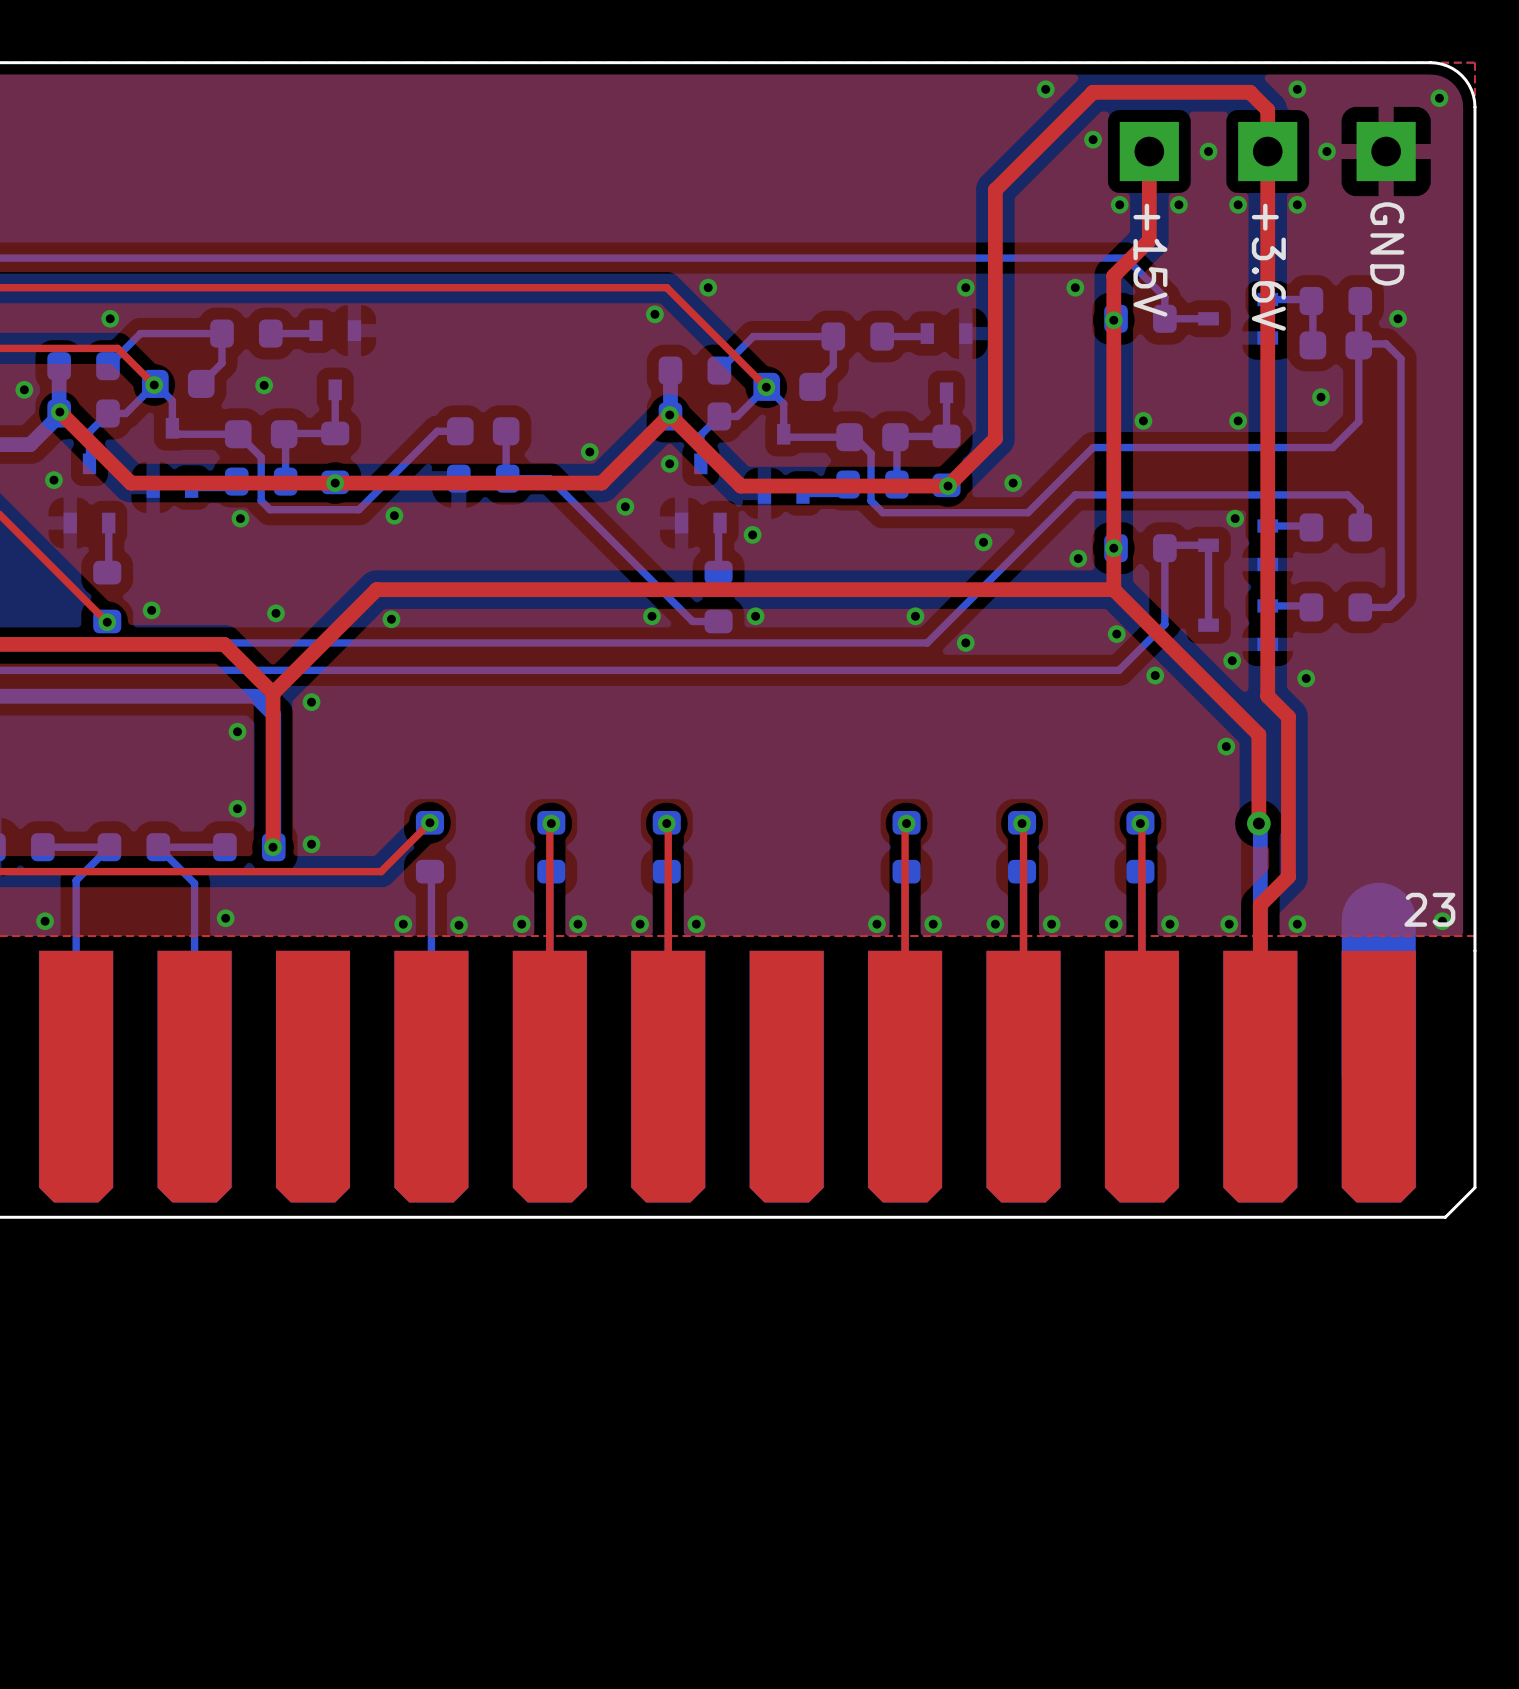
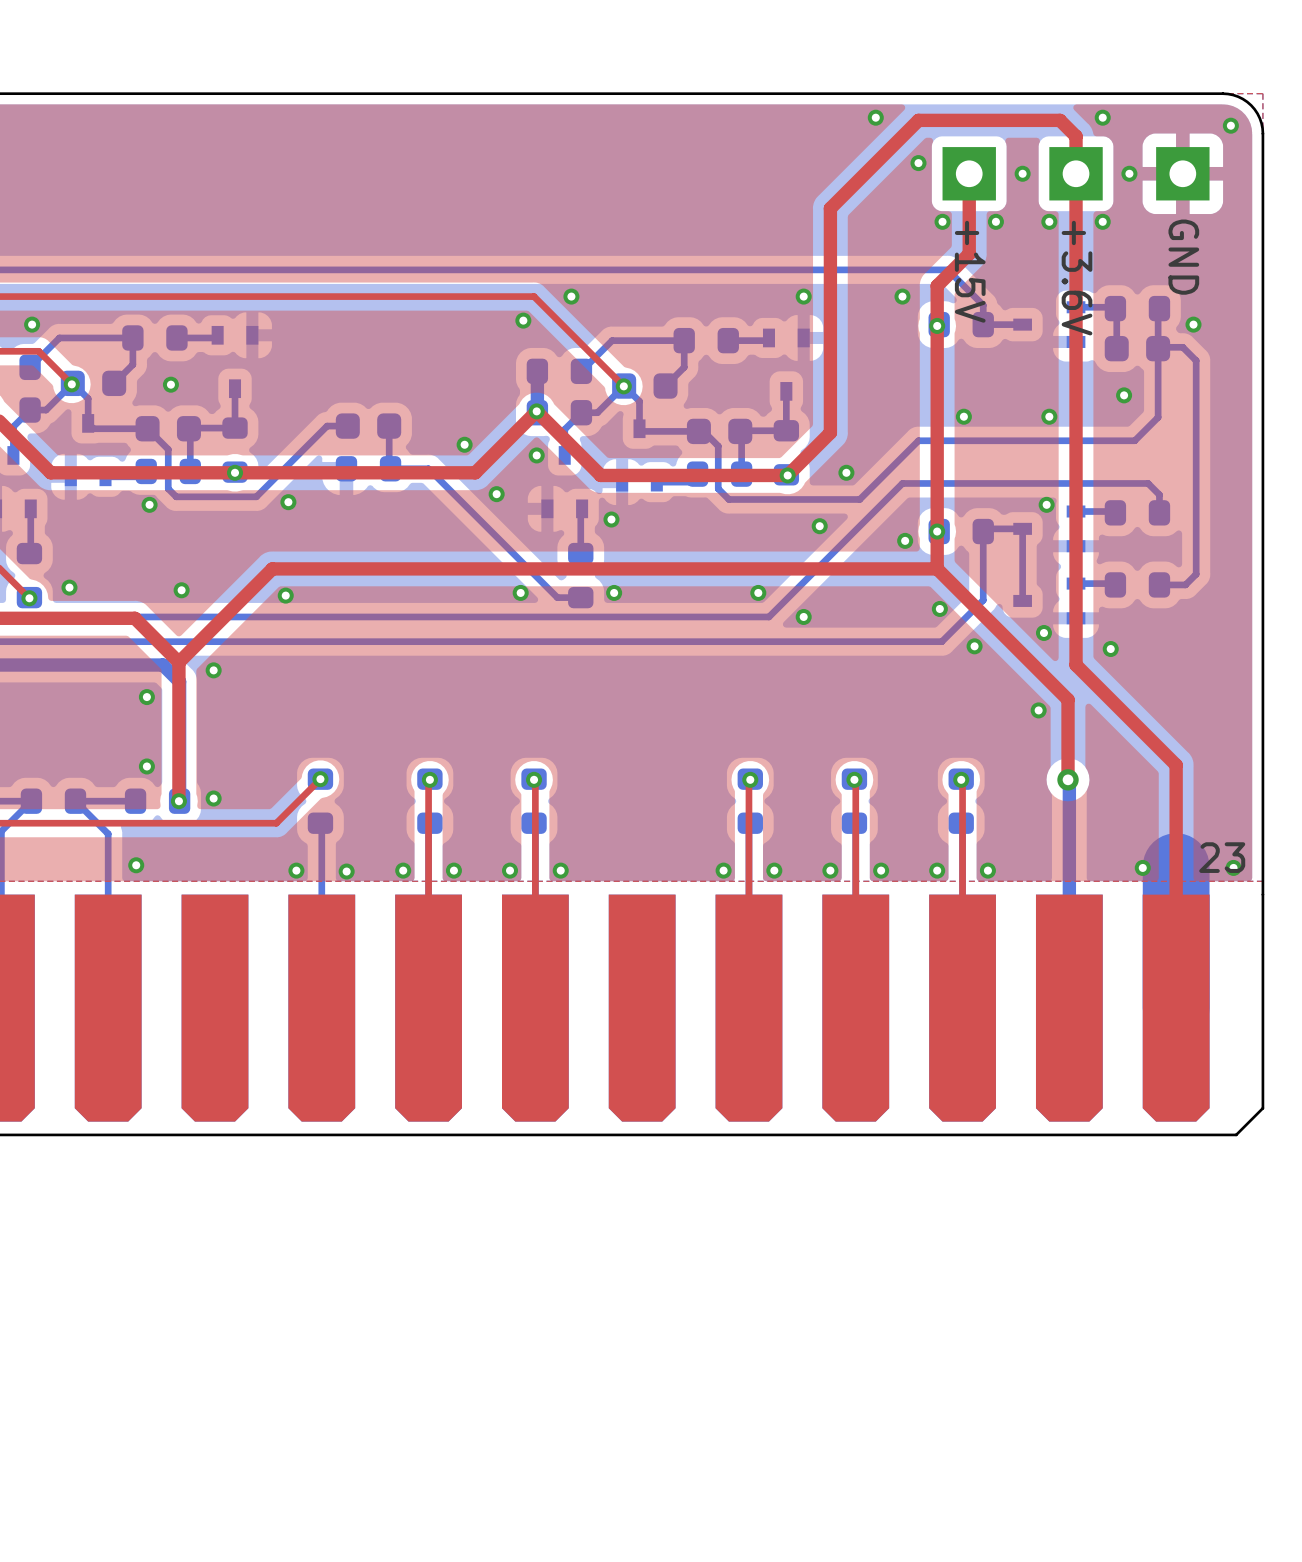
top track: (1288, 716) (1288, 876) (1260, 904) (1260, 1076) -> (1094, 683) (1176, 765) (1176, 1008)
via: (1229, 924) -> none
via position: (1297, 924) -> (1142, 867)

